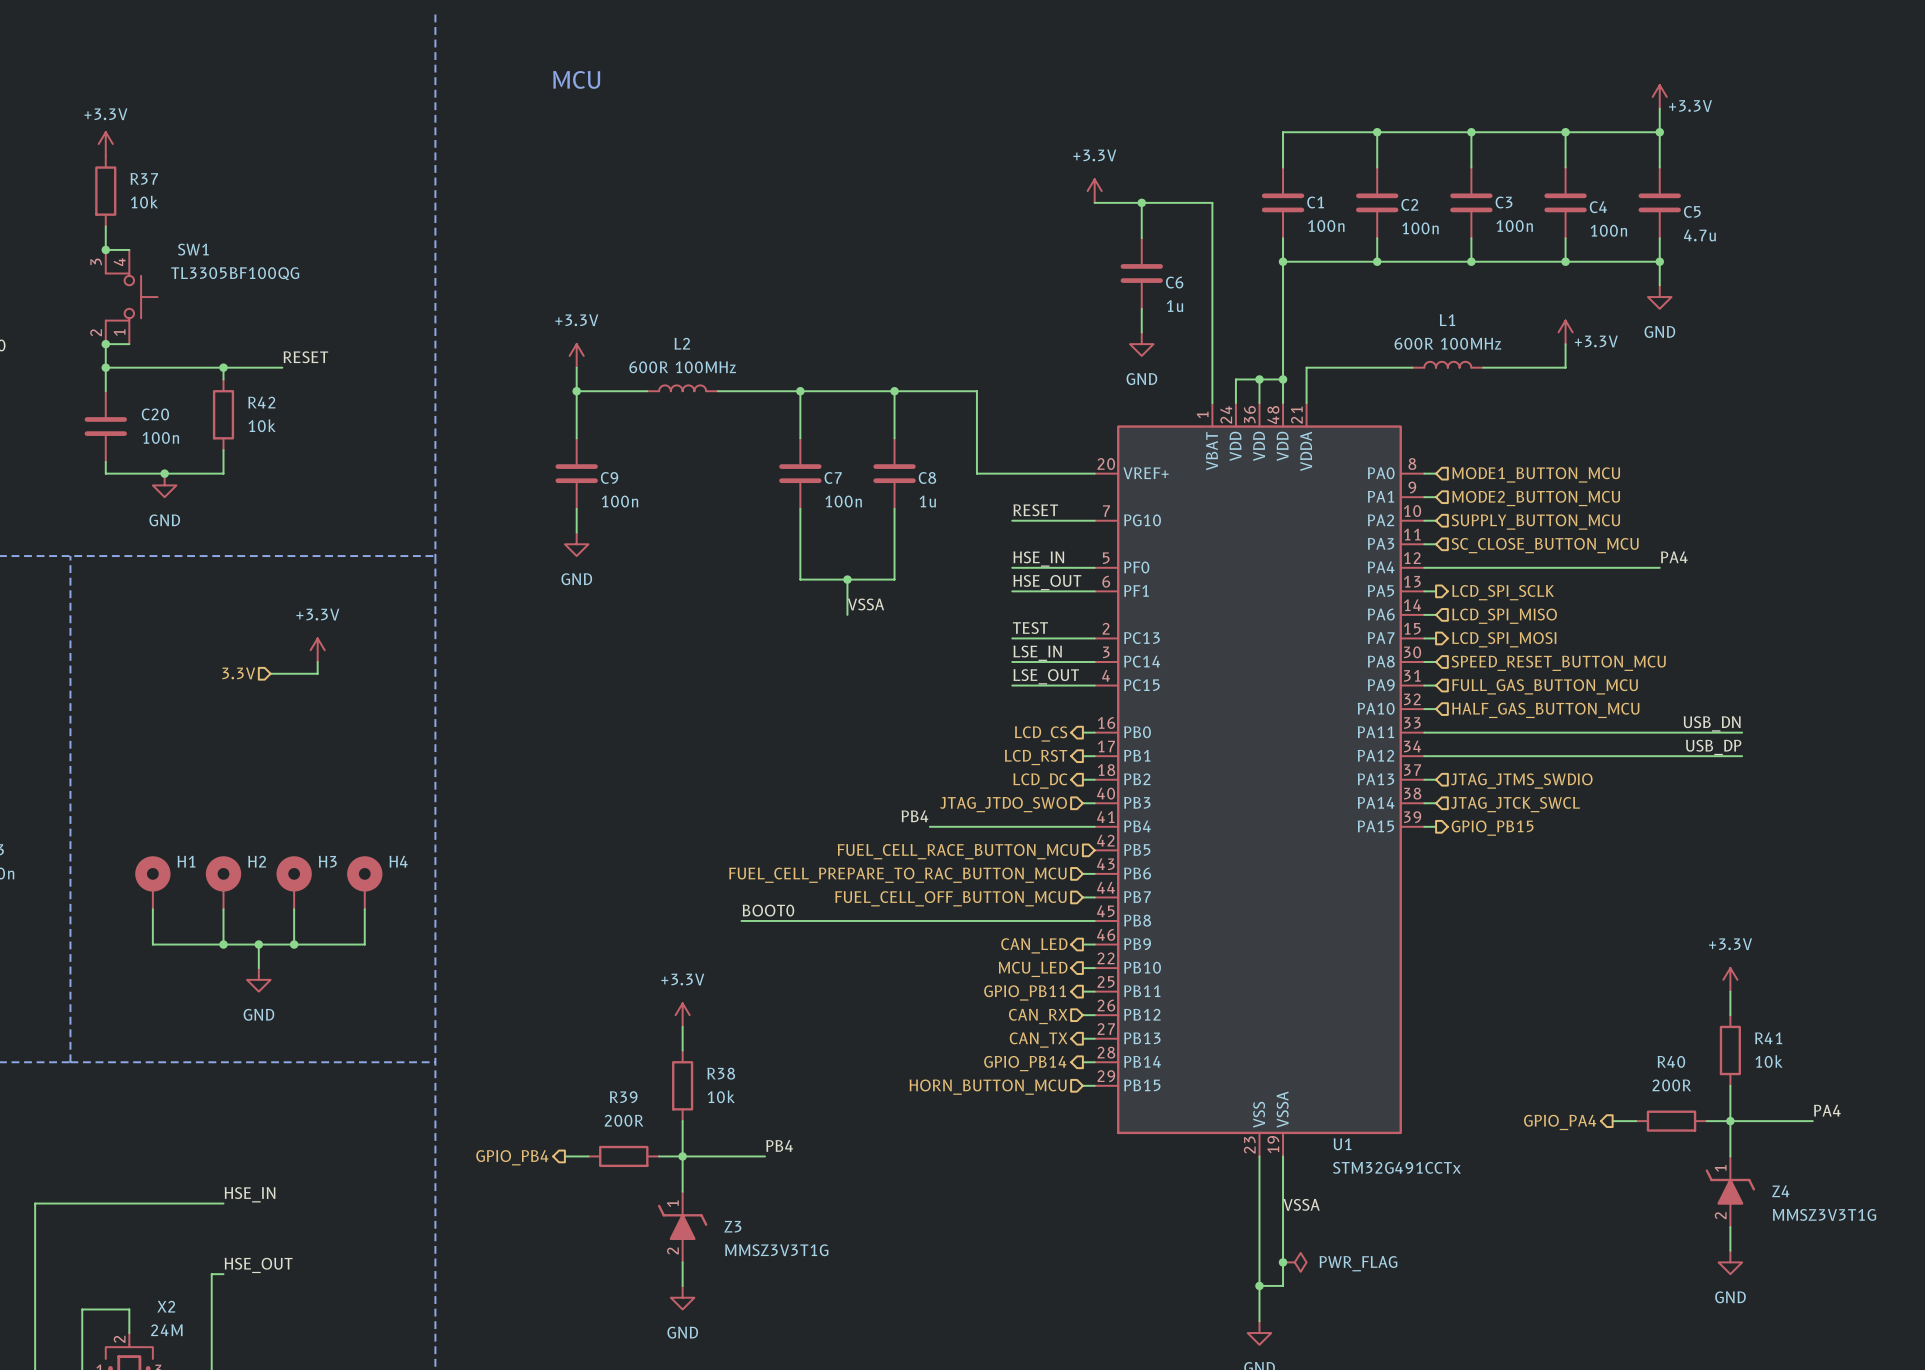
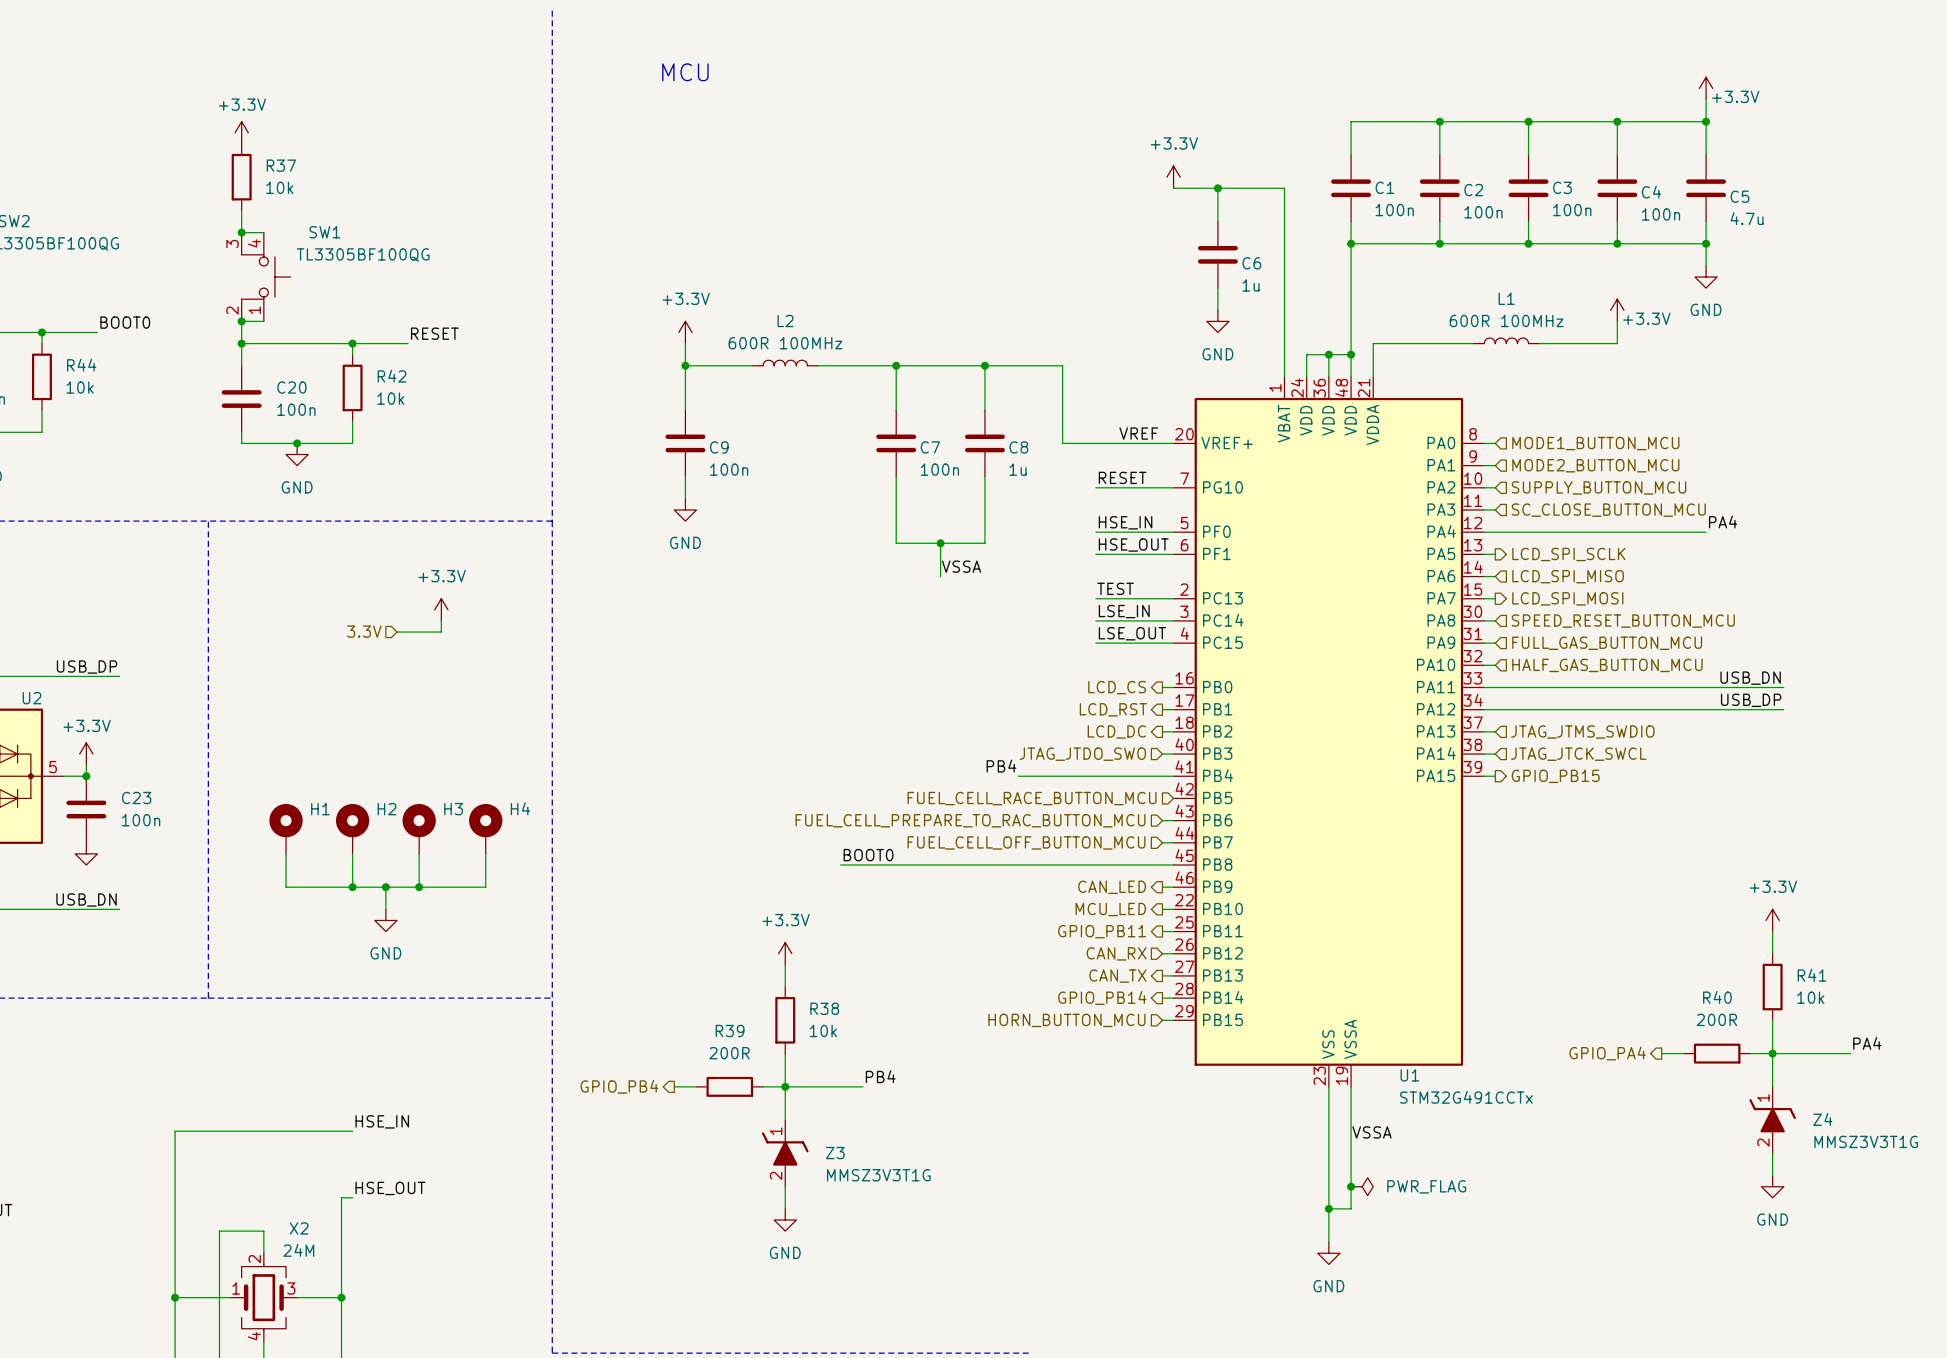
label: none -> VREF (1138, 433)

